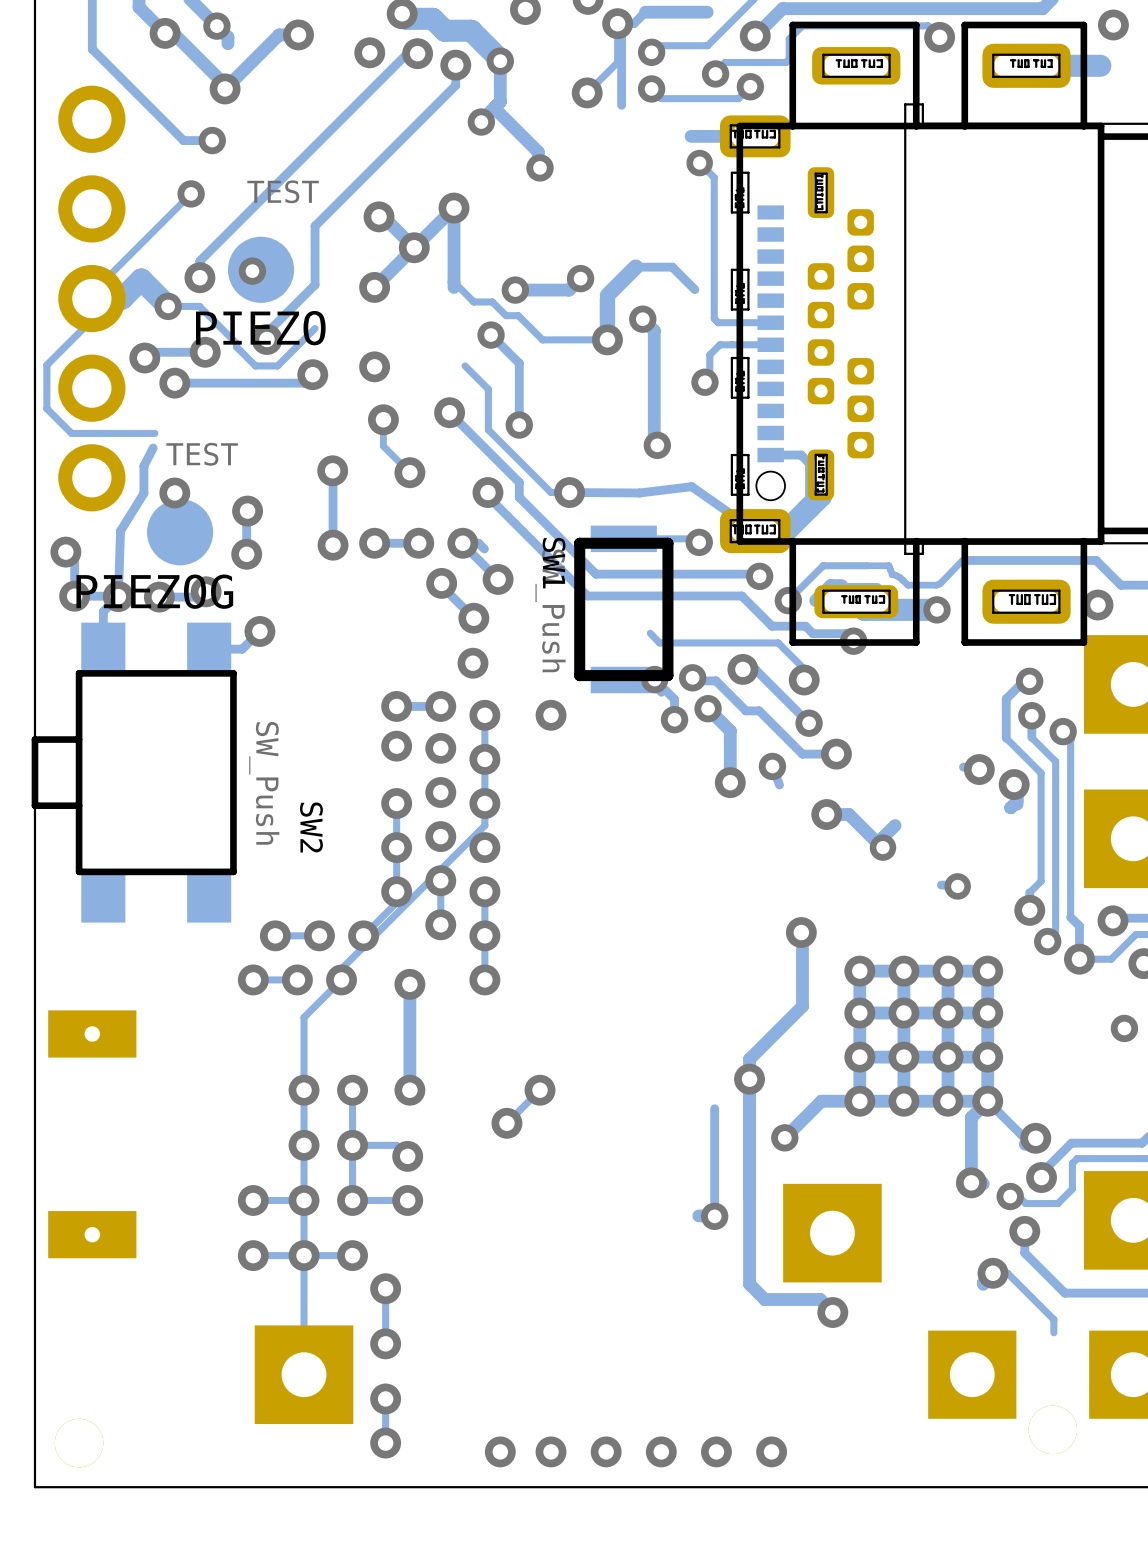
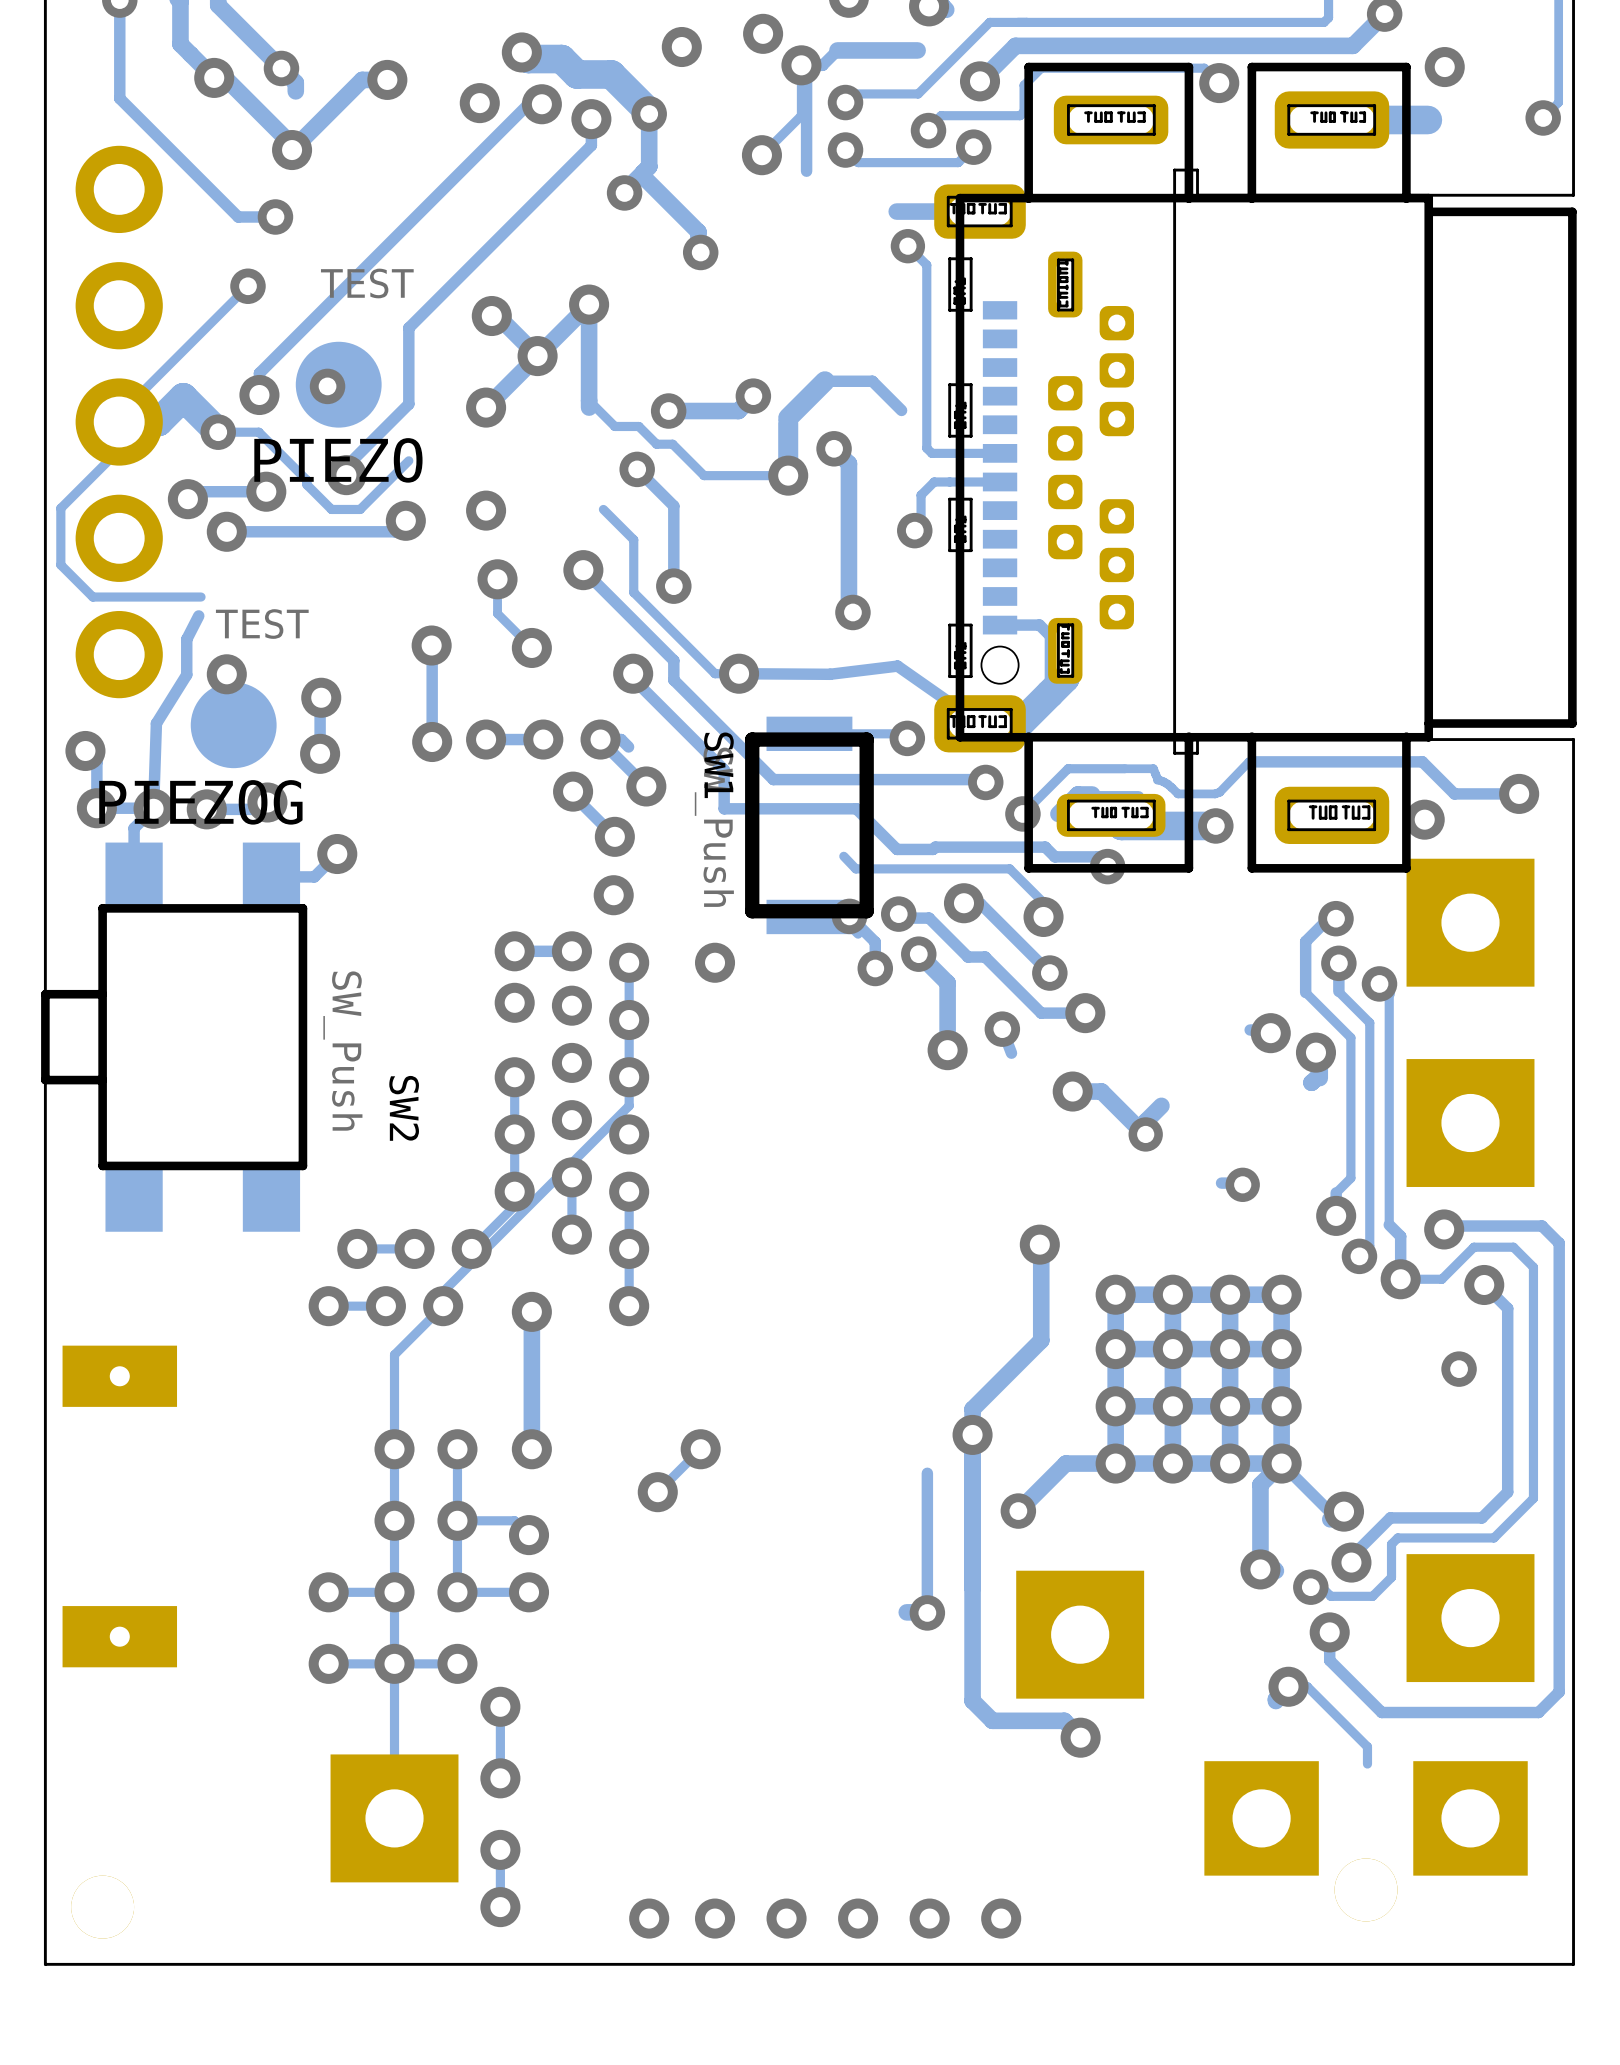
track: (558, 566) (587, 595) (741, 595) (772, 626) -> (724, 769) (724, 808) (856, 808) (897, 849) (1001, 847)

